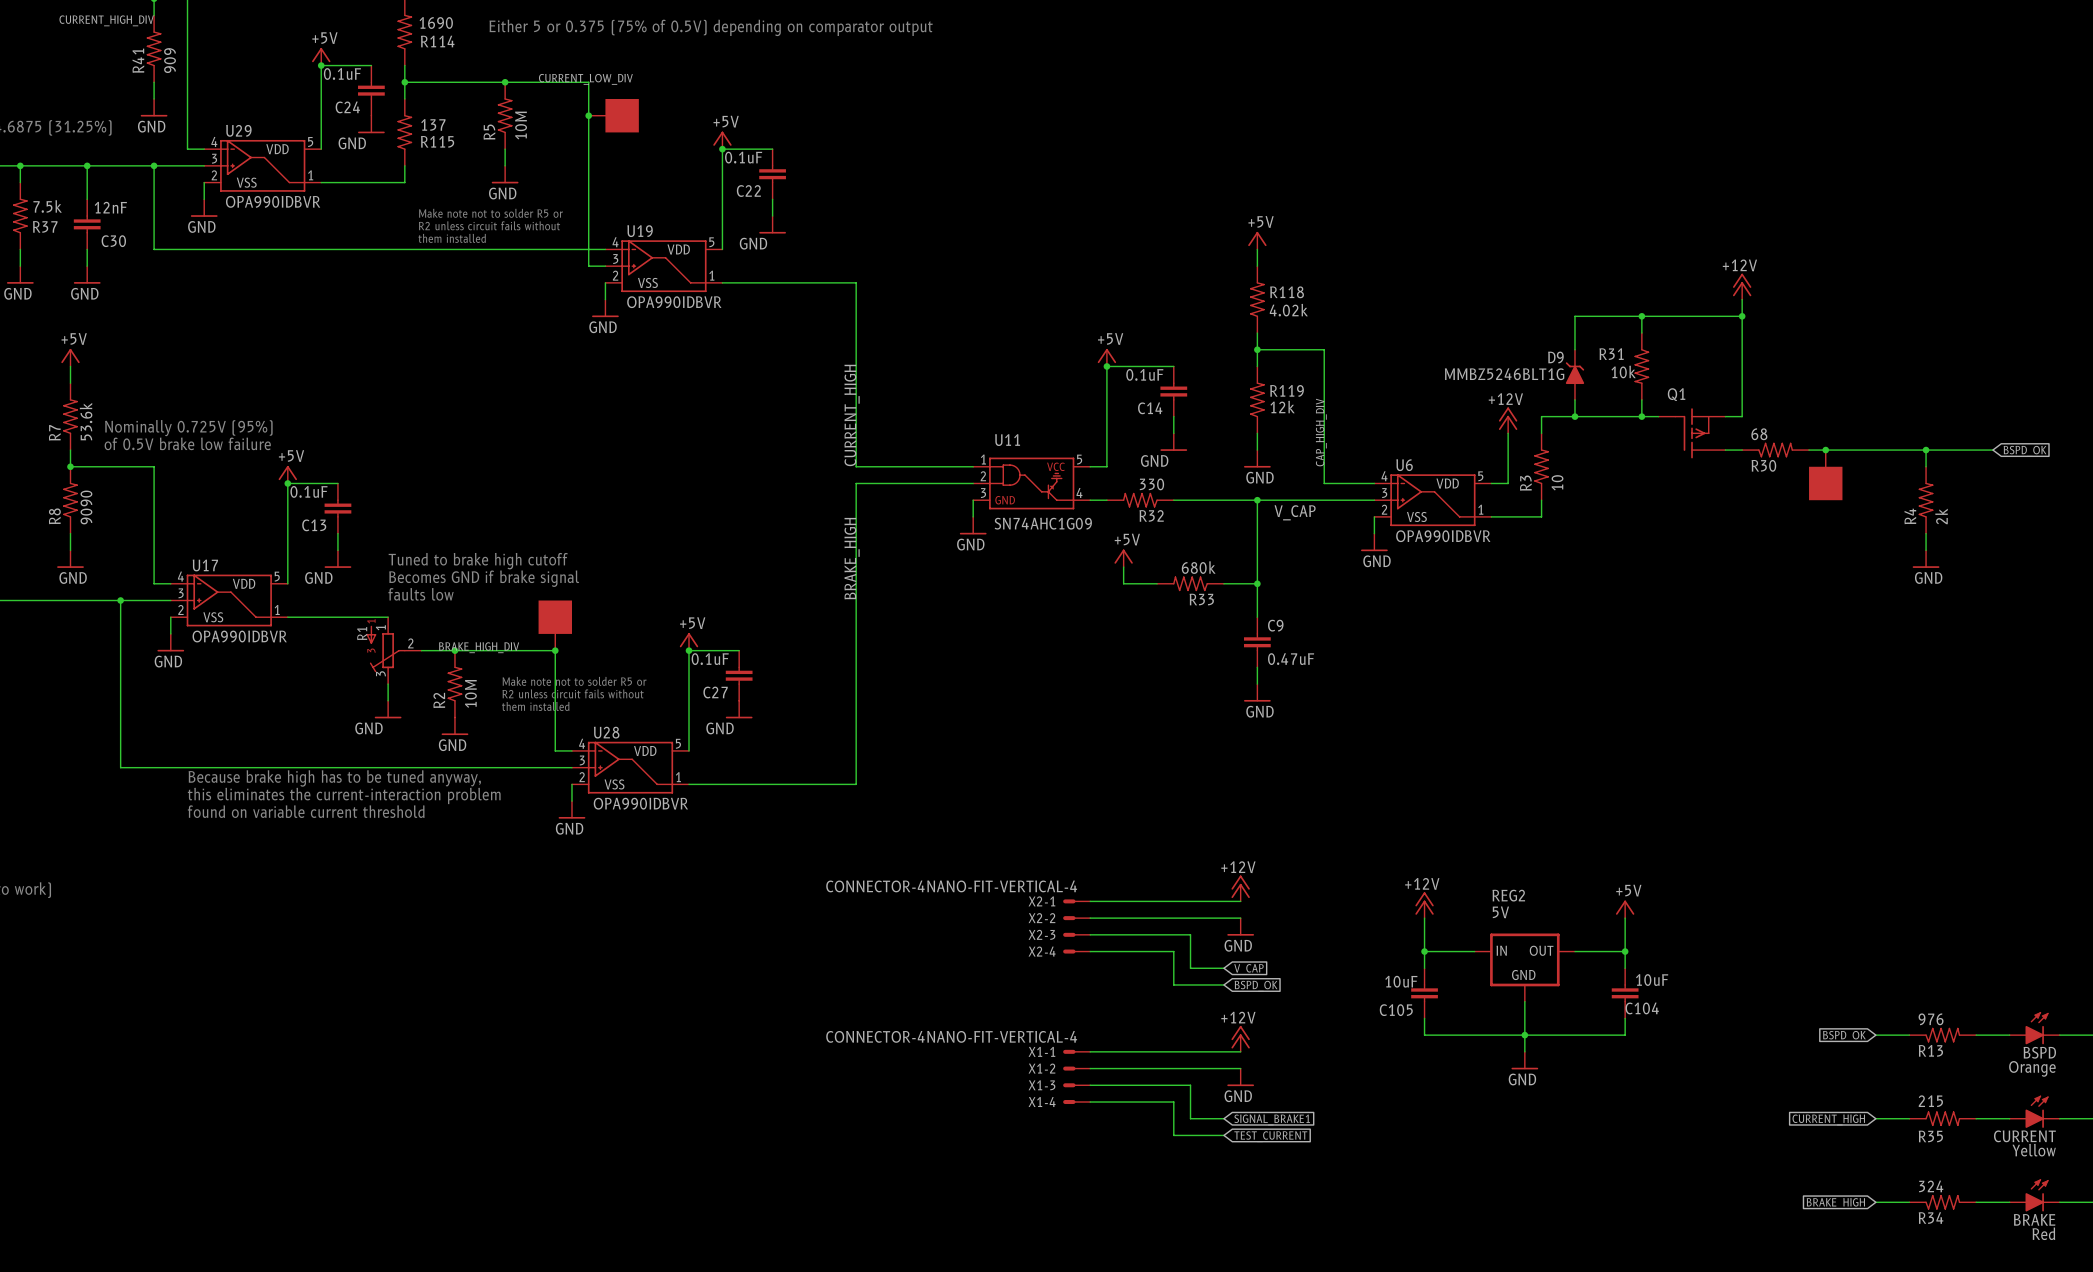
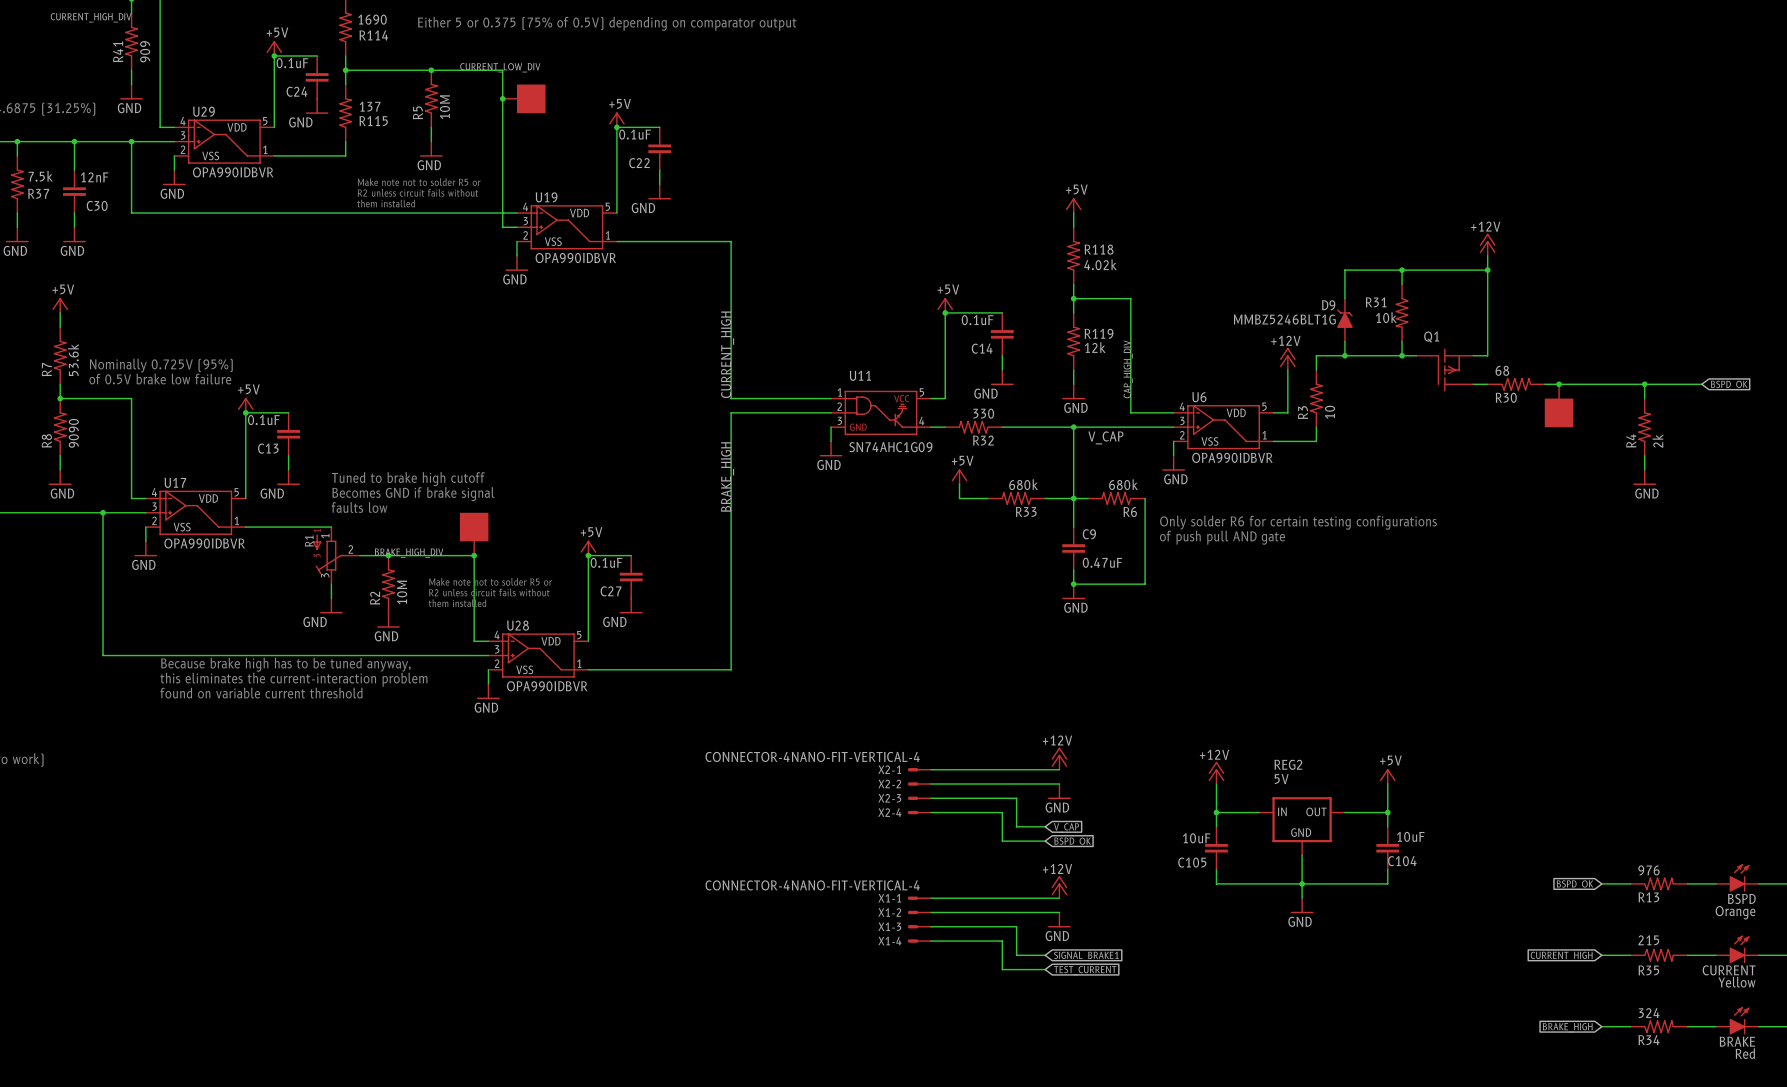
wire: none -> (1073, 498) (1087, 498)
R6: none -> 680k (1116, 498)
wire: none -> (1145, 498) (1145, 584) (1073, 584)
text: none -> Only solder R6 for certain testing configurations (1298, 522)
text: none -> of push pull AND gate (1222, 537)
junction: none -> (1073, 584)

